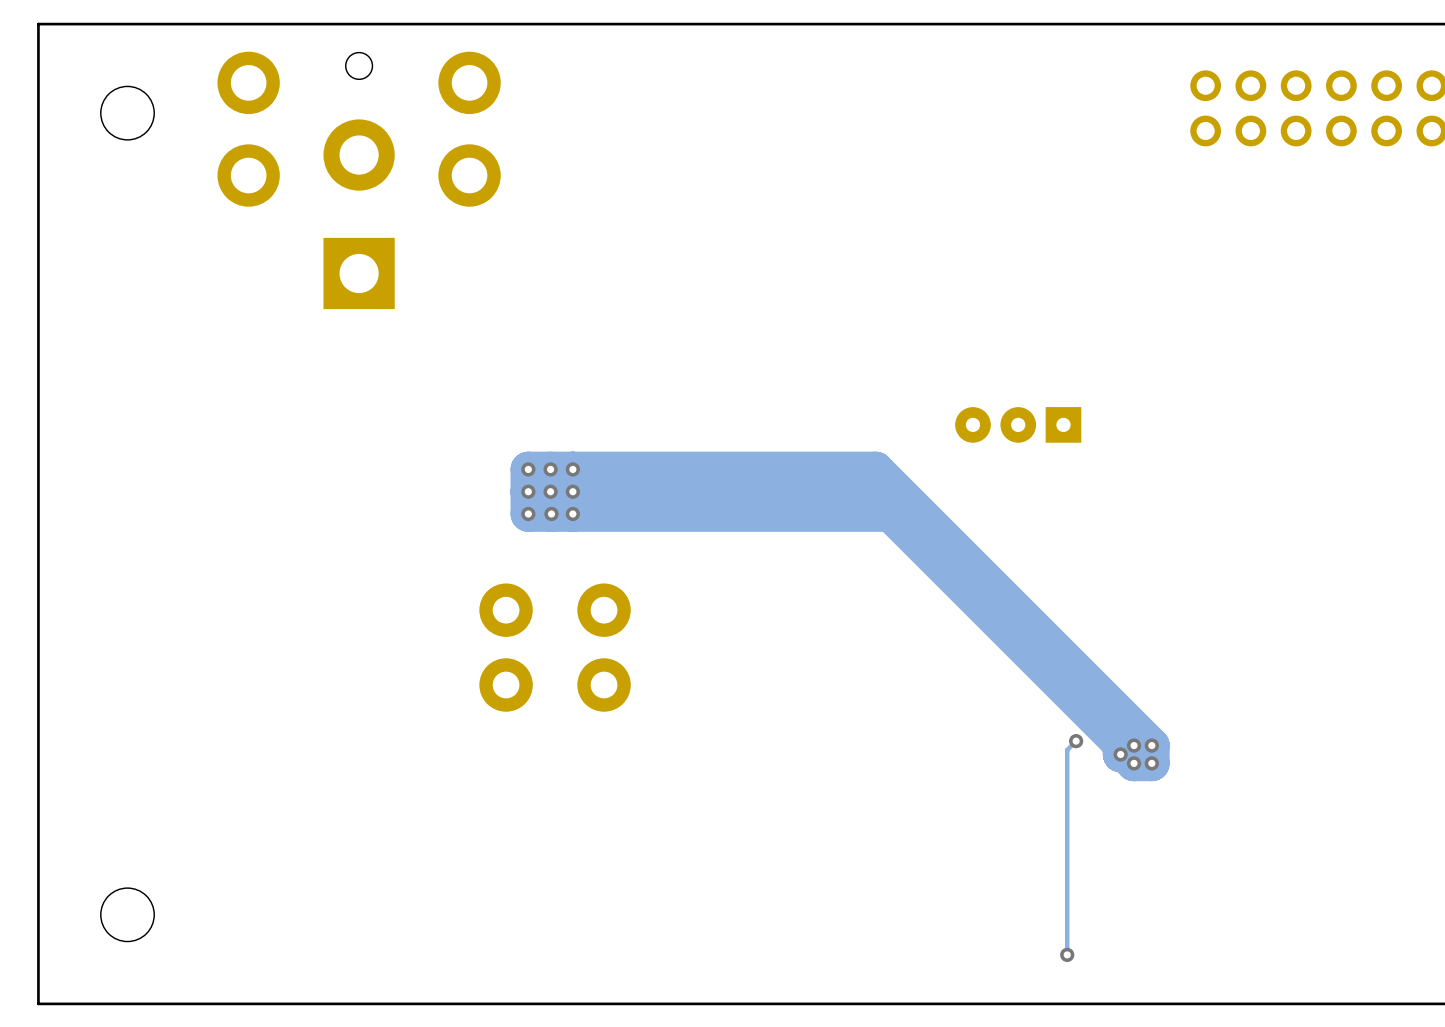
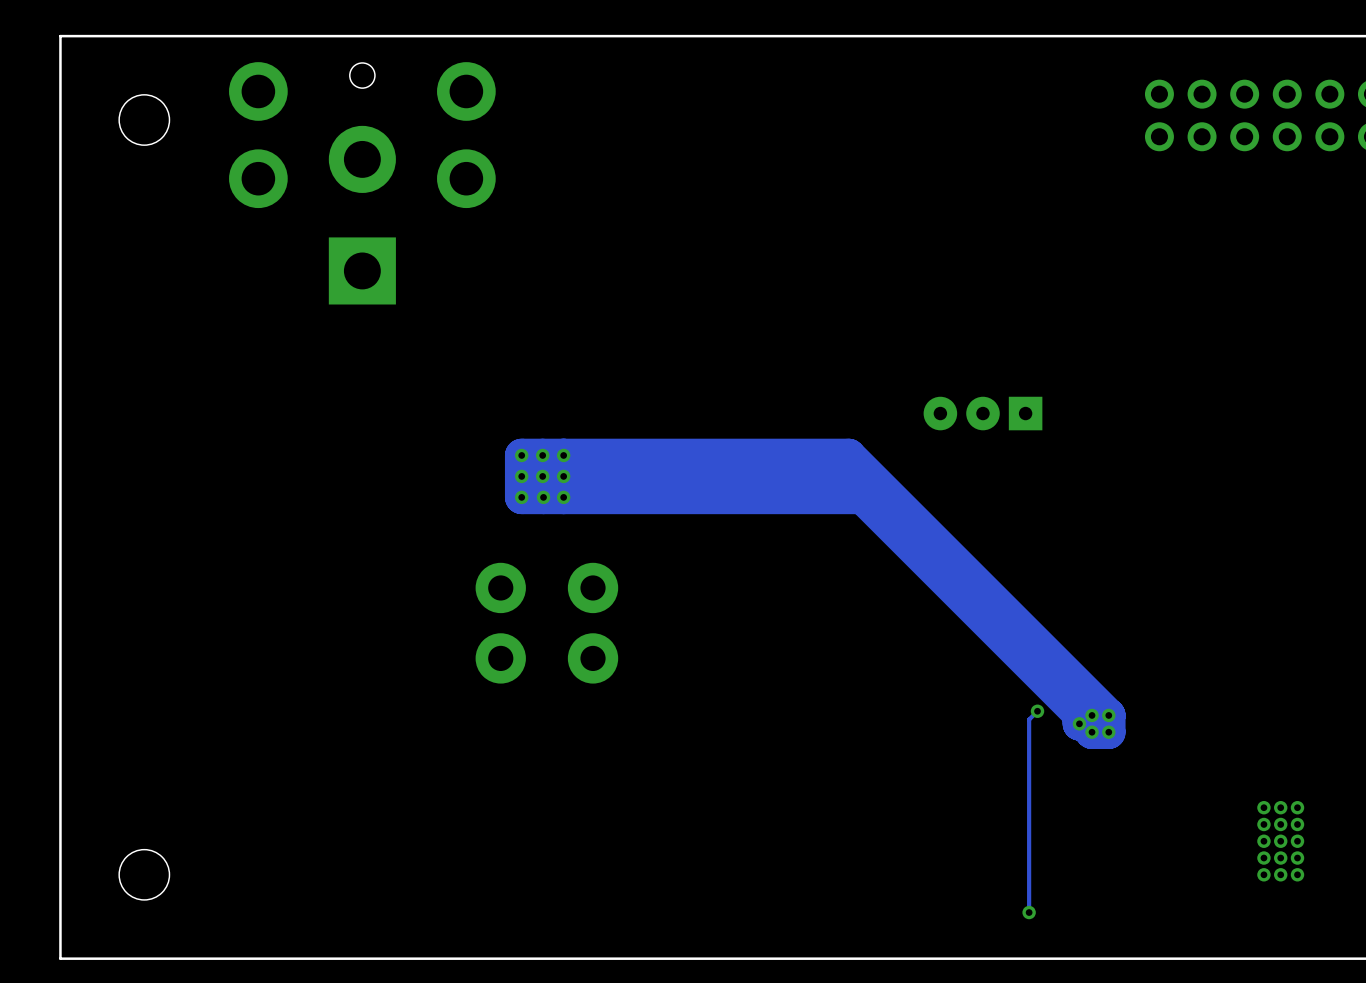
via: none -> (1263, 807)
via: none -> (1280, 807)
via: none -> (1297, 807)
via: none -> (1263, 824)
via: none -> (1280, 824)
via: none -> (1297, 824)
via: none -> (1263, 841)
via: none -> (1280, 841)
via: none -> (1297, 841)
via: none -> (1263, 858)
via: none -> (1280, 858)
via: none -> (1297, 858)
via: none -> (1263, 874)
via: none -> (1280, 874)
via: none -> (1297, 874)

